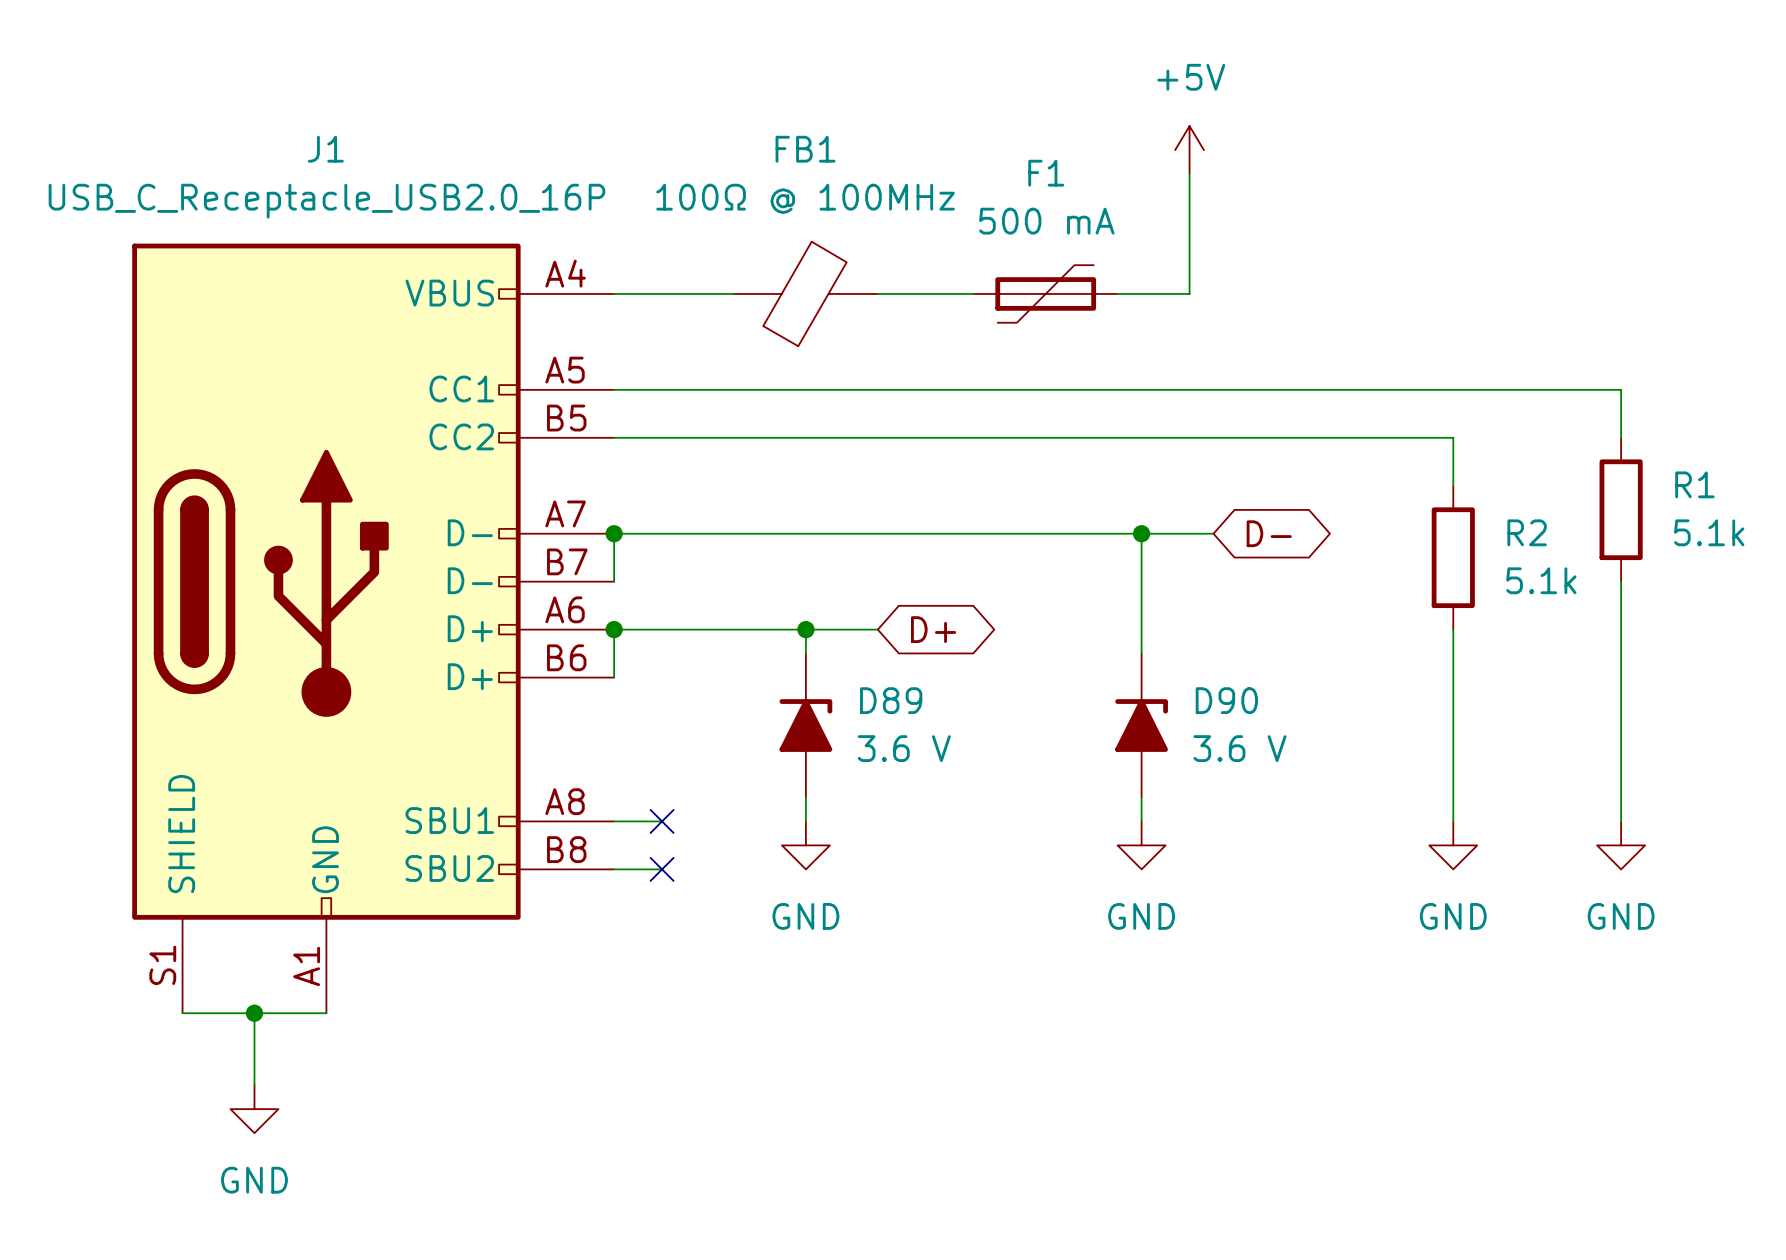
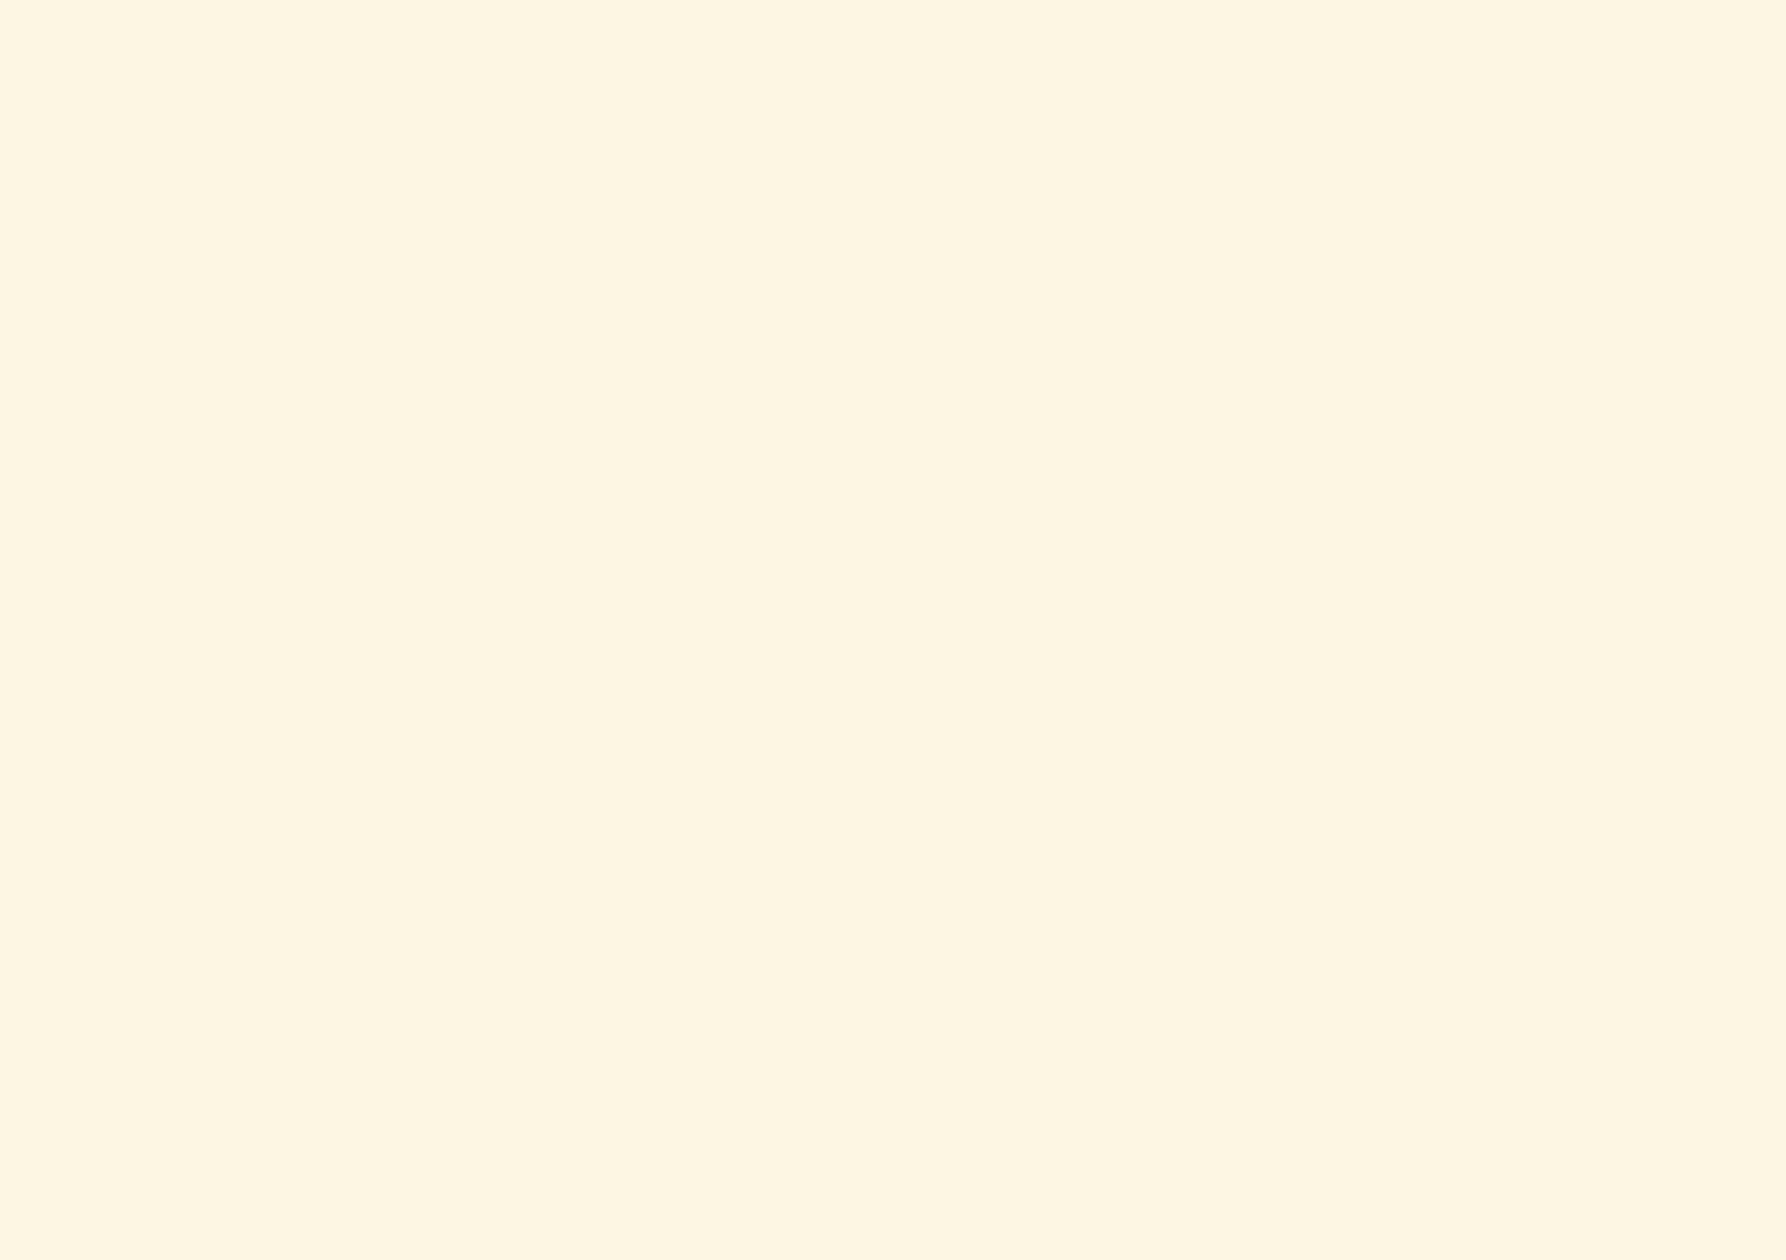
power symbol: +5V (1189, 150) -> none
wire: (1189, 174) (1189, 293) (1117, 293) -> none
wire: (614, 293) (734, 293) -> none
FB1: 100Ω @ 100MHz (805, 293) -> none
wire: (877, 293) (973, 293) -> none
F1: 500 mA (1045, 293) -> none
wire: (614, 389) (1621, 389) (1621, 437) -> none
wire: (614, 437) (1453, 437) (1453, 485) -> none
R1: 5.1k (1621, 509) -> none
junction: (614, 533) -> none
wire: (1141, 533) (1141, 653) -> none
junction: (1141, 533) -> none
wire: (1213, 533) (614, 533) (614, 581) -> none
global label: D- (1269, 533) -> none
R2: 5.1k (1453, 557) -> none
wire: (1621, 581) (1621, 821) -> none
J1: USB_C_Receptacle_USB2.0_16P (373, 628) -> none
junction: (614, 629) -> none
wire: (805, 629) (805, 653) -> none
junction: (805, 629) -> none
wire: (877, 629) (614, 629) (614, 677) -> none
global label: D+ (933, 629) -> none
wire: (1453, 629) (1453, 821) -> none
D89: 3.6 V (805, 725) -> none
D90: 3.6 V (1141, 725) -> none
wire: (805, 797) (805, 821) -> none
wire: (1141, 797) (1141, 821) -> none
wire: (614, 821) (662, 821) -> none
no-connect mark: (662, 821) -> none
power symbol: GND (805, 845) -> none
power symbol: GND (1141, 845) -> none
power symbol: GND (1453, 845) -> none
power symbol: GND (1621, 845) -> none
wire: (614, 869) (662, 869) -> none
no-connect mark: (662, 869) -> none
wire: (182, 1013) (326, 1013) -> none
wire: (254, 1013) (254, 1085) -> none
junction: (254, 1013) -> none
power symbol: GND (254, 1109) -> none

